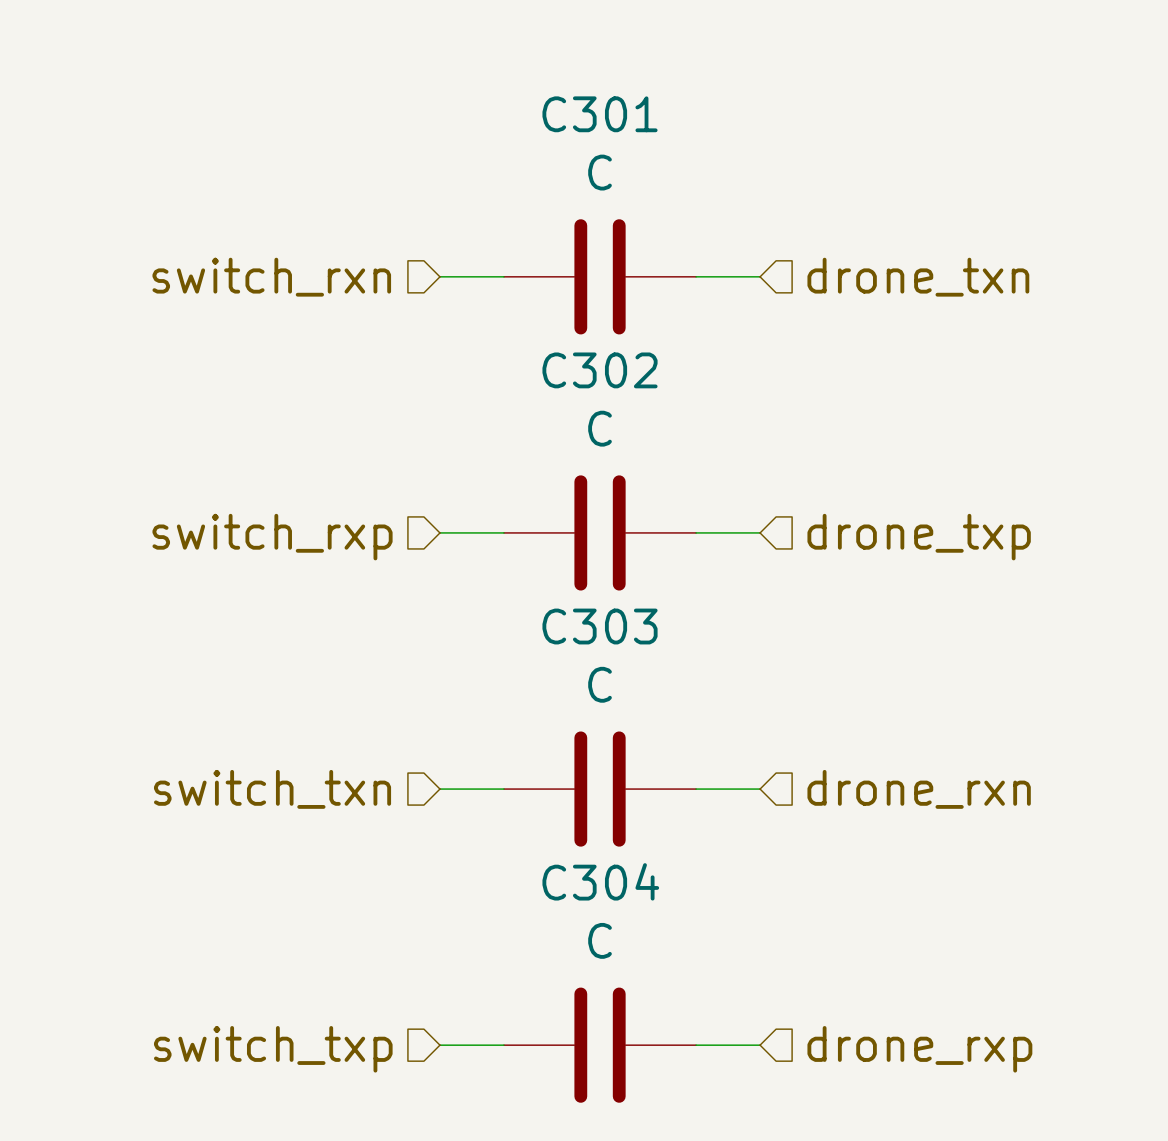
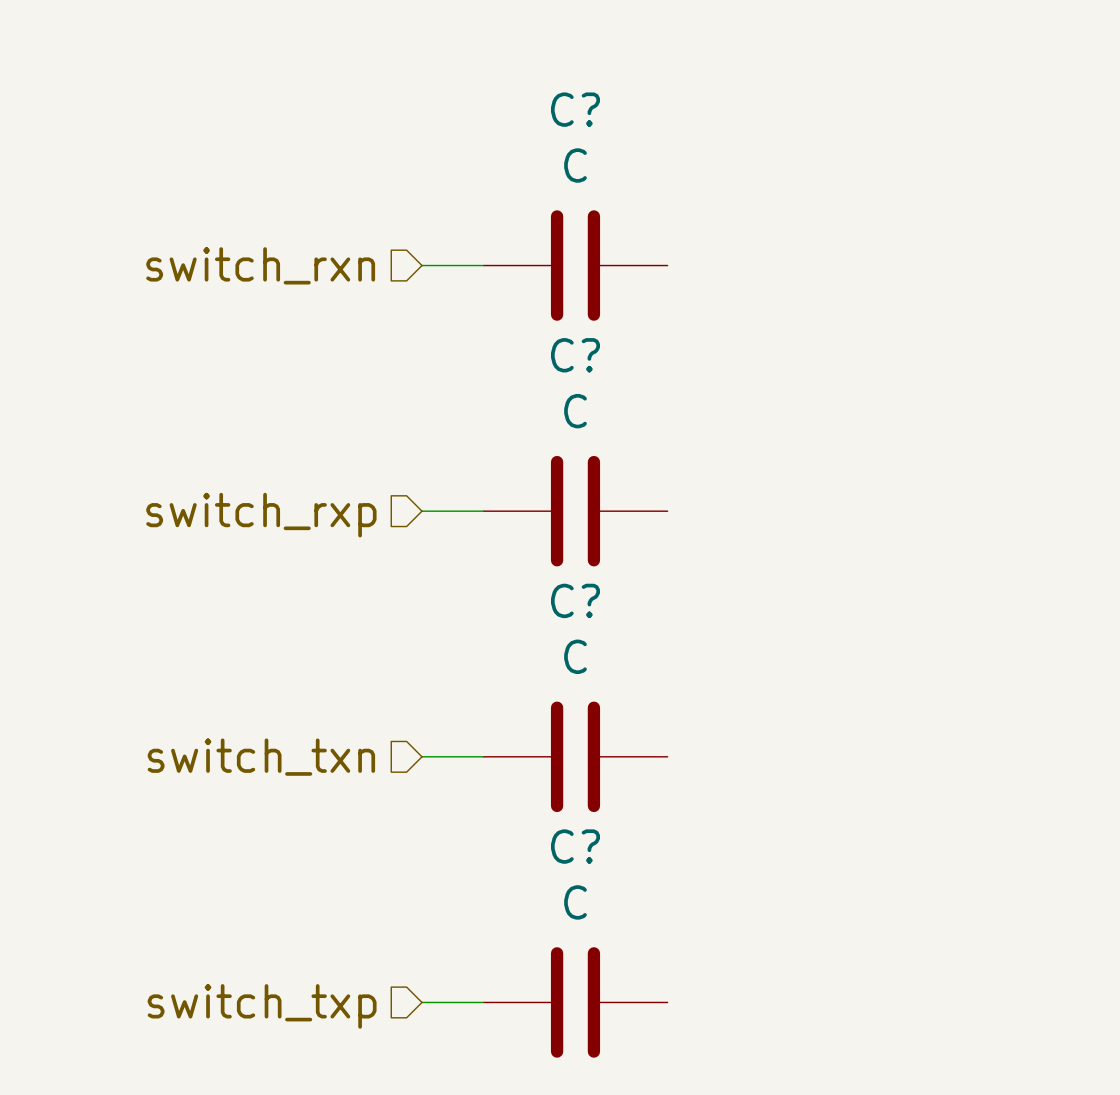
C301 name: C301 (600, 114) -> C? (575, 109)
wire: (696, 276) (760, 276) -> none
hierarchical label: drone_txn (918, 277) -> none
C302 name: C302 (600, 370) -> C? (575, 355)
wire: (696, 532) (760, 532) -> none
hierarchical label: drone_txp (919, 537) -> none
C303 name: C303 (600, 626) -> C? (575, 600)
wire: (696, 789) (760, 789) -> none
hierarchical label: drone_rxn (919, 789) -> none
C304 name: C304 (600, 881) -> C? (575, 846)
wire: (696, 1045) (760, 1045) -> none
hierarchical label: drone_rxp (919, 1049) -> none

